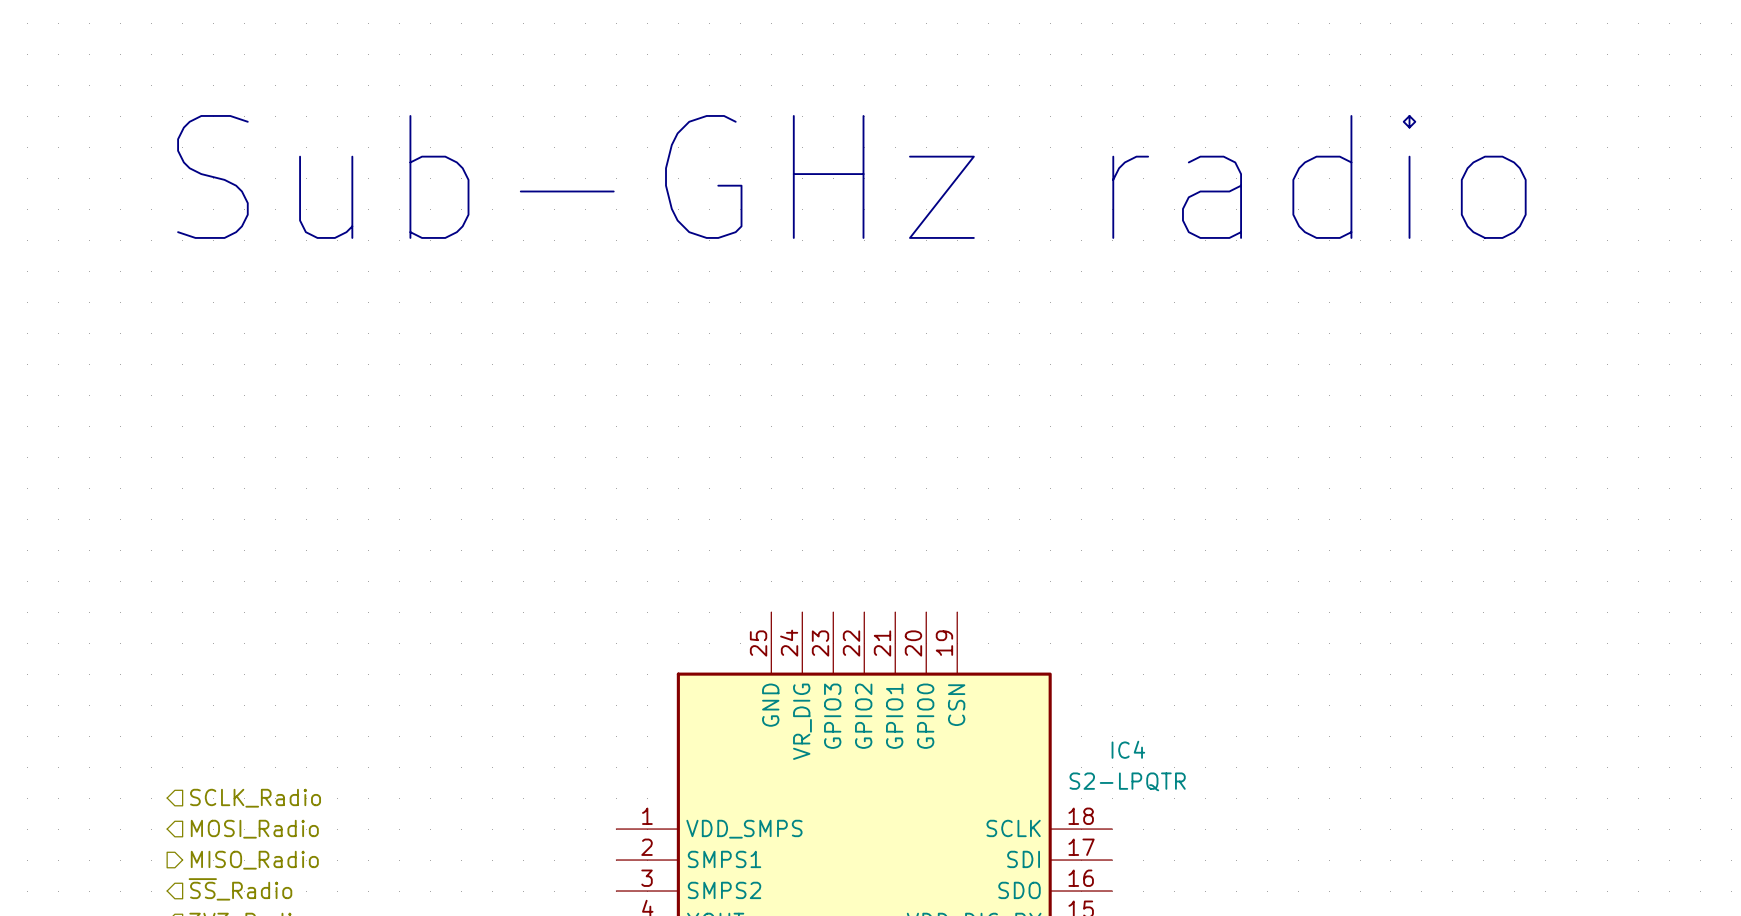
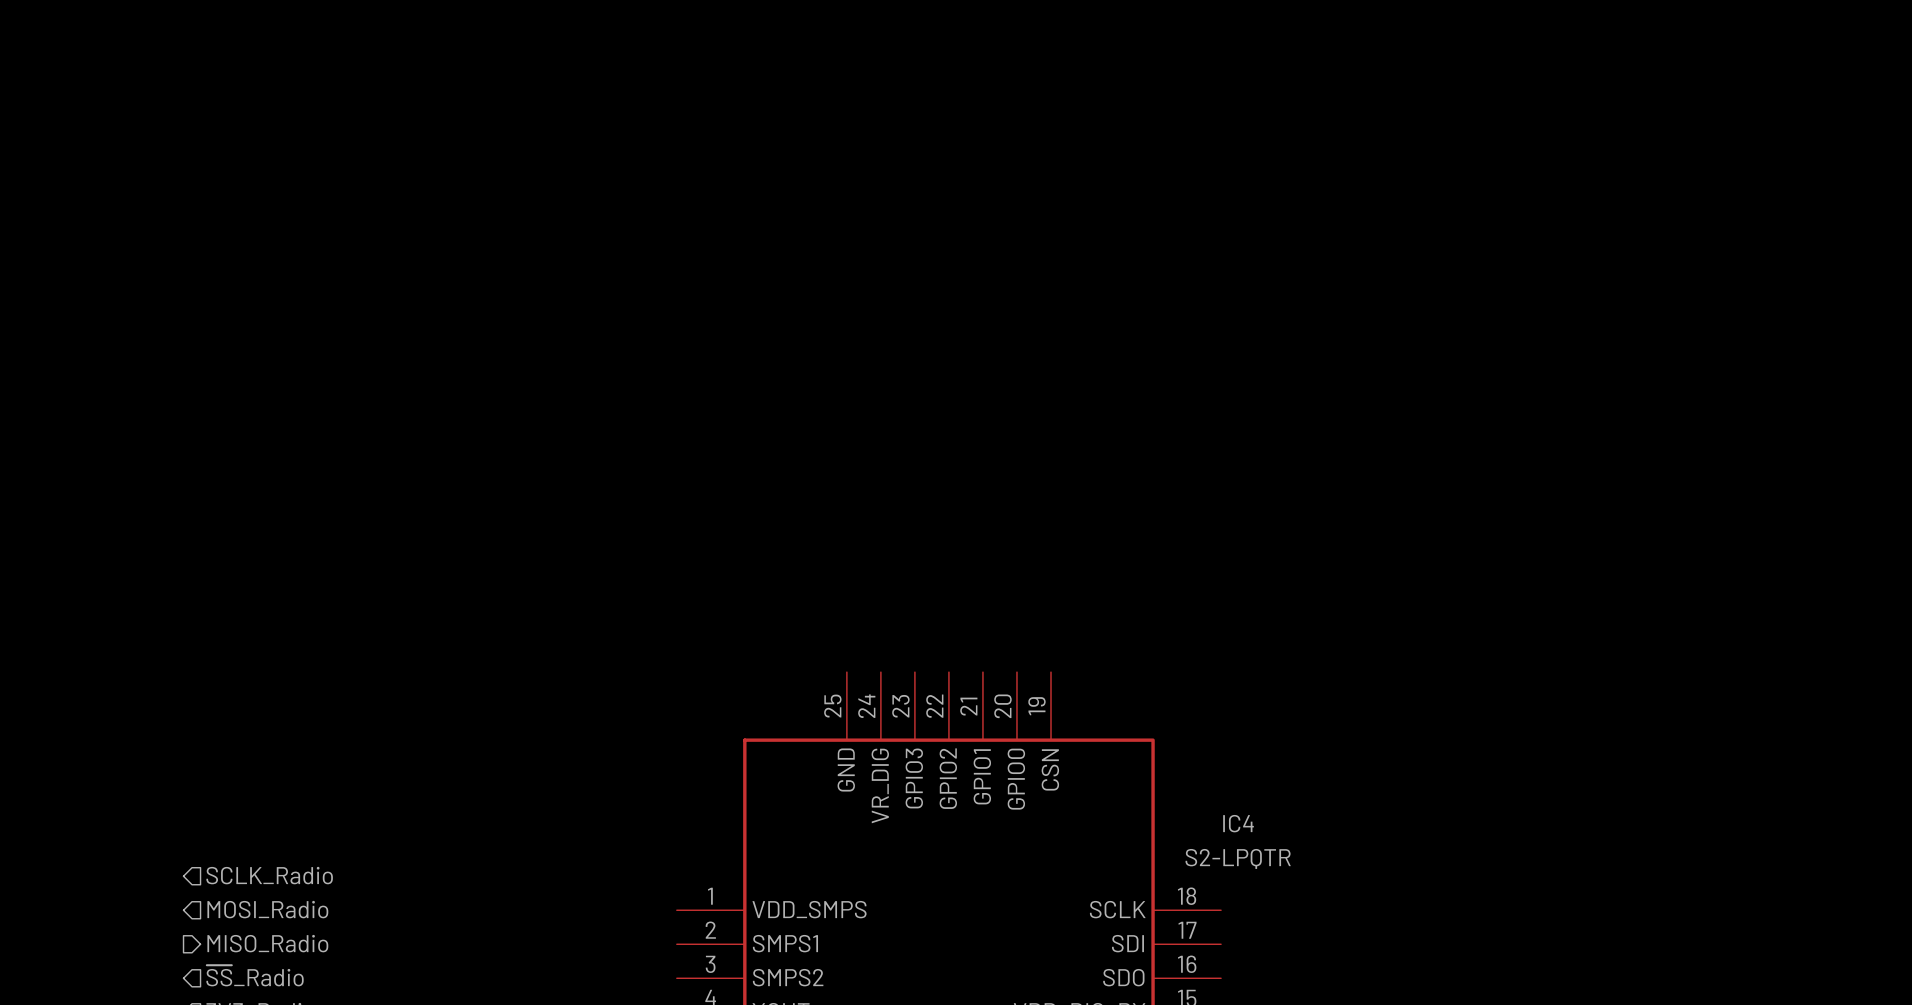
text: Sub-GHz radio (851, 176) -> none

